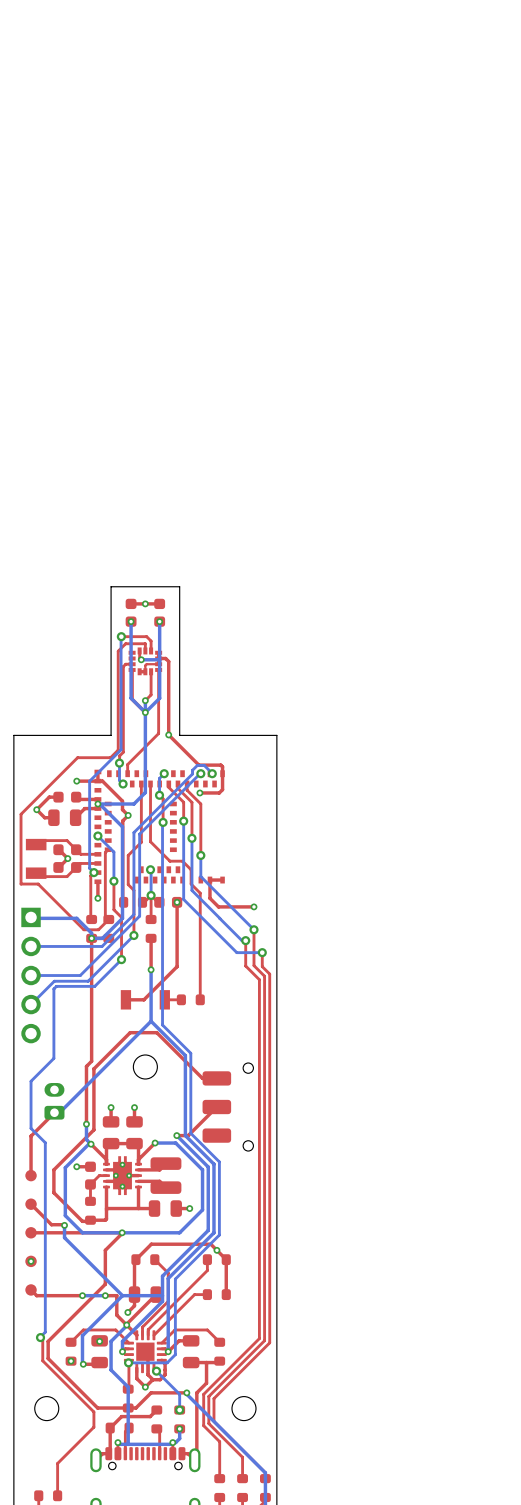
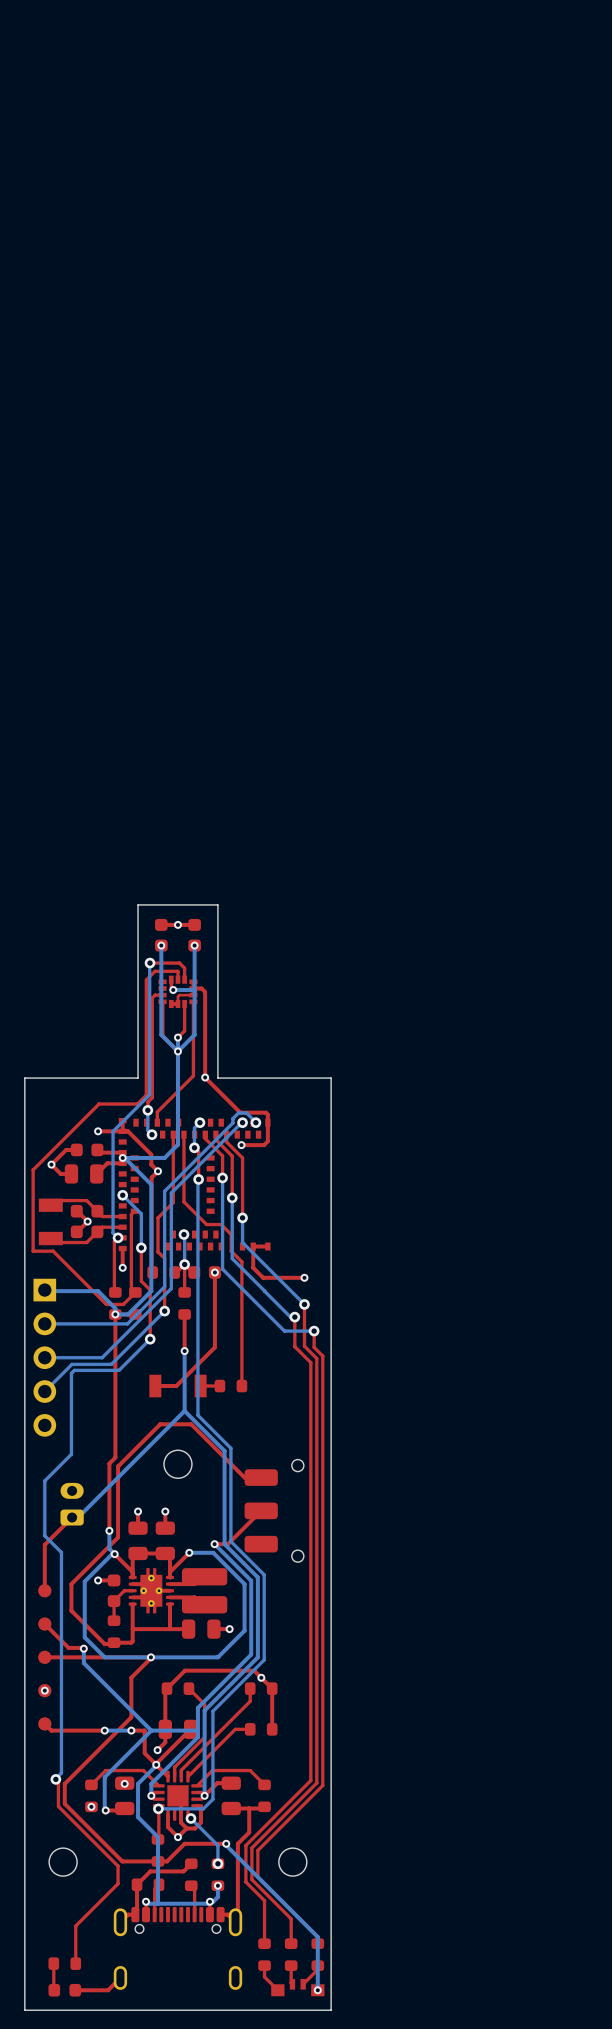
part footprint: [150, 1157, 182, 1194] -> [181, 1568, 228, 1614]

